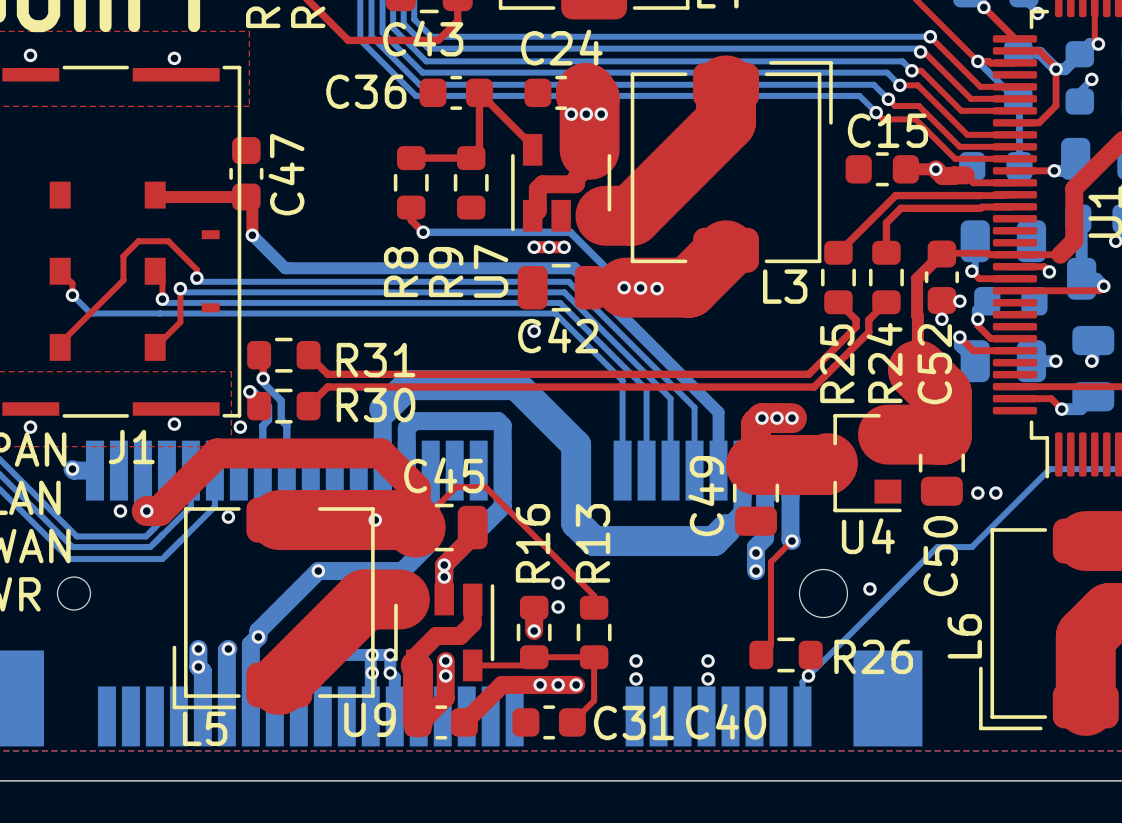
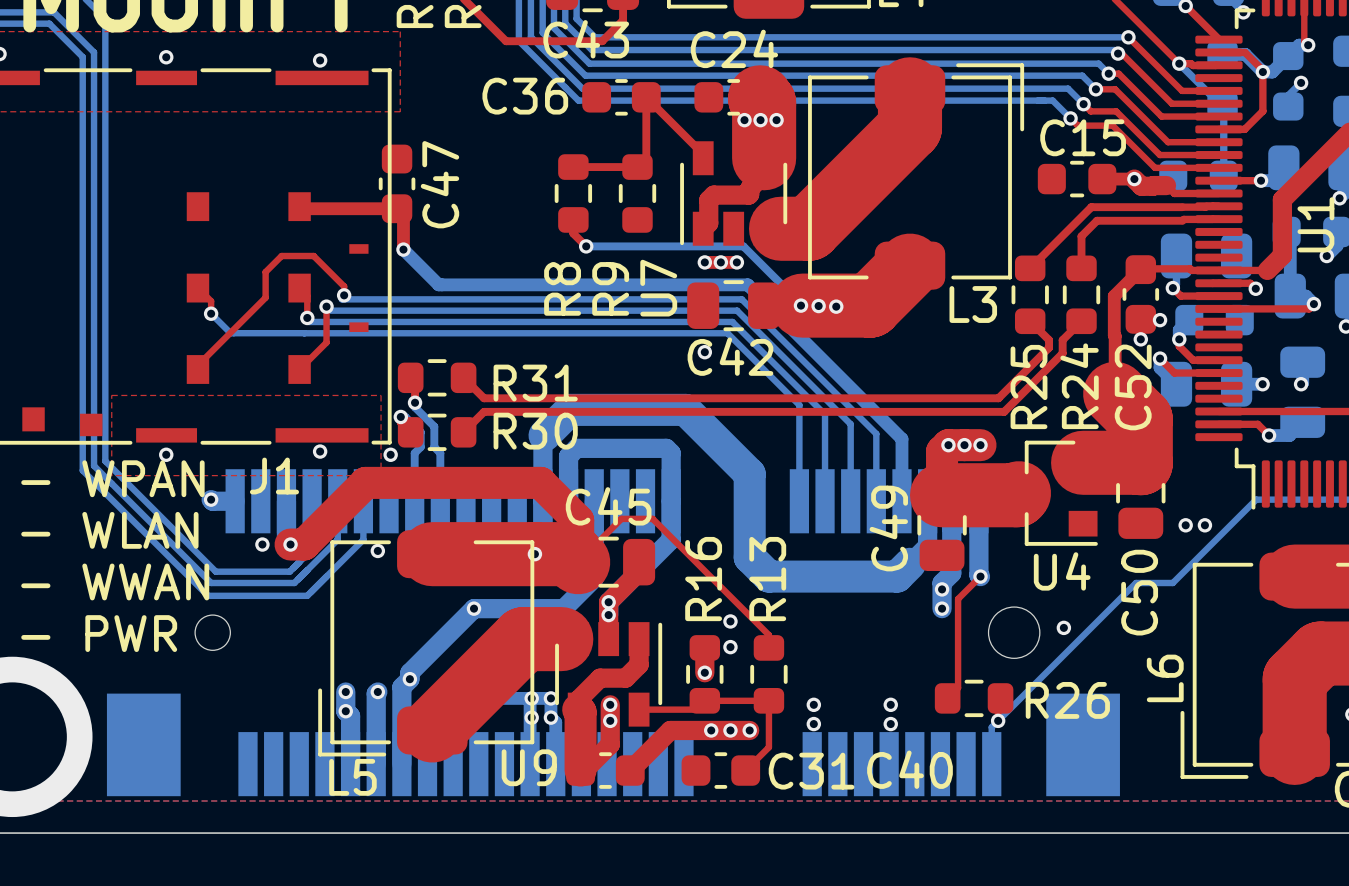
via: (977, 493) -> none
via: none -> (1185, 525)
via: (995, 493) -> none
via: none -> (1204, 525)

